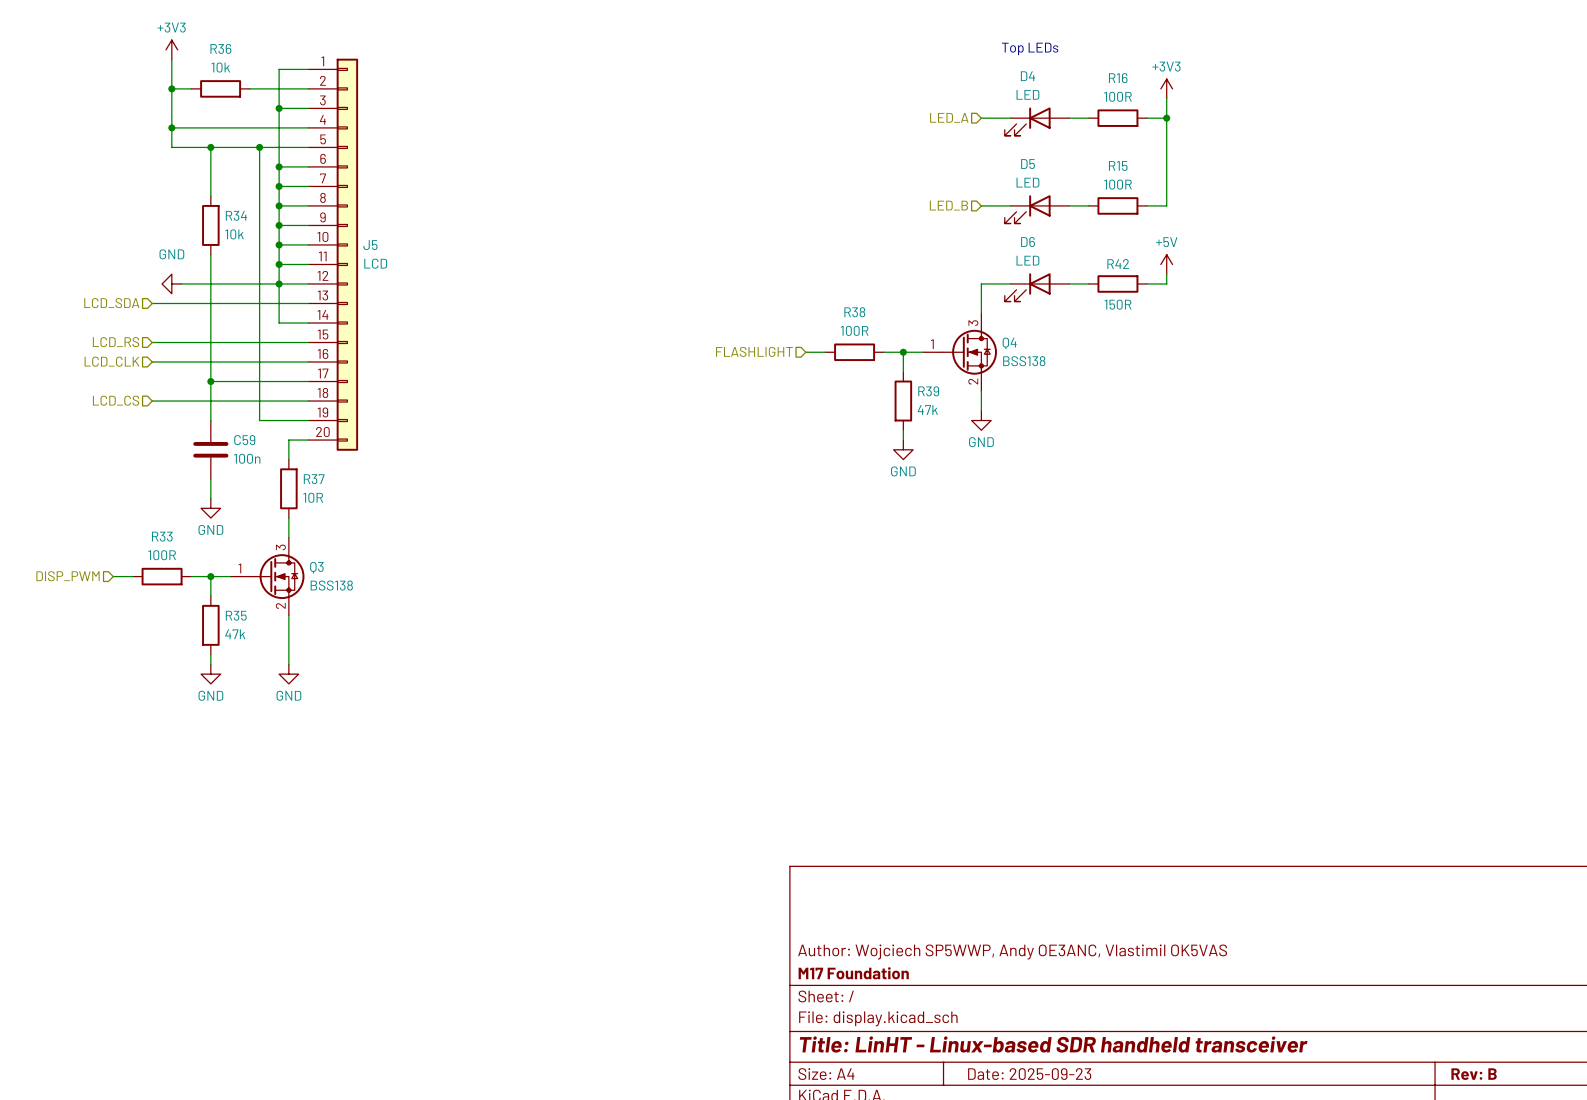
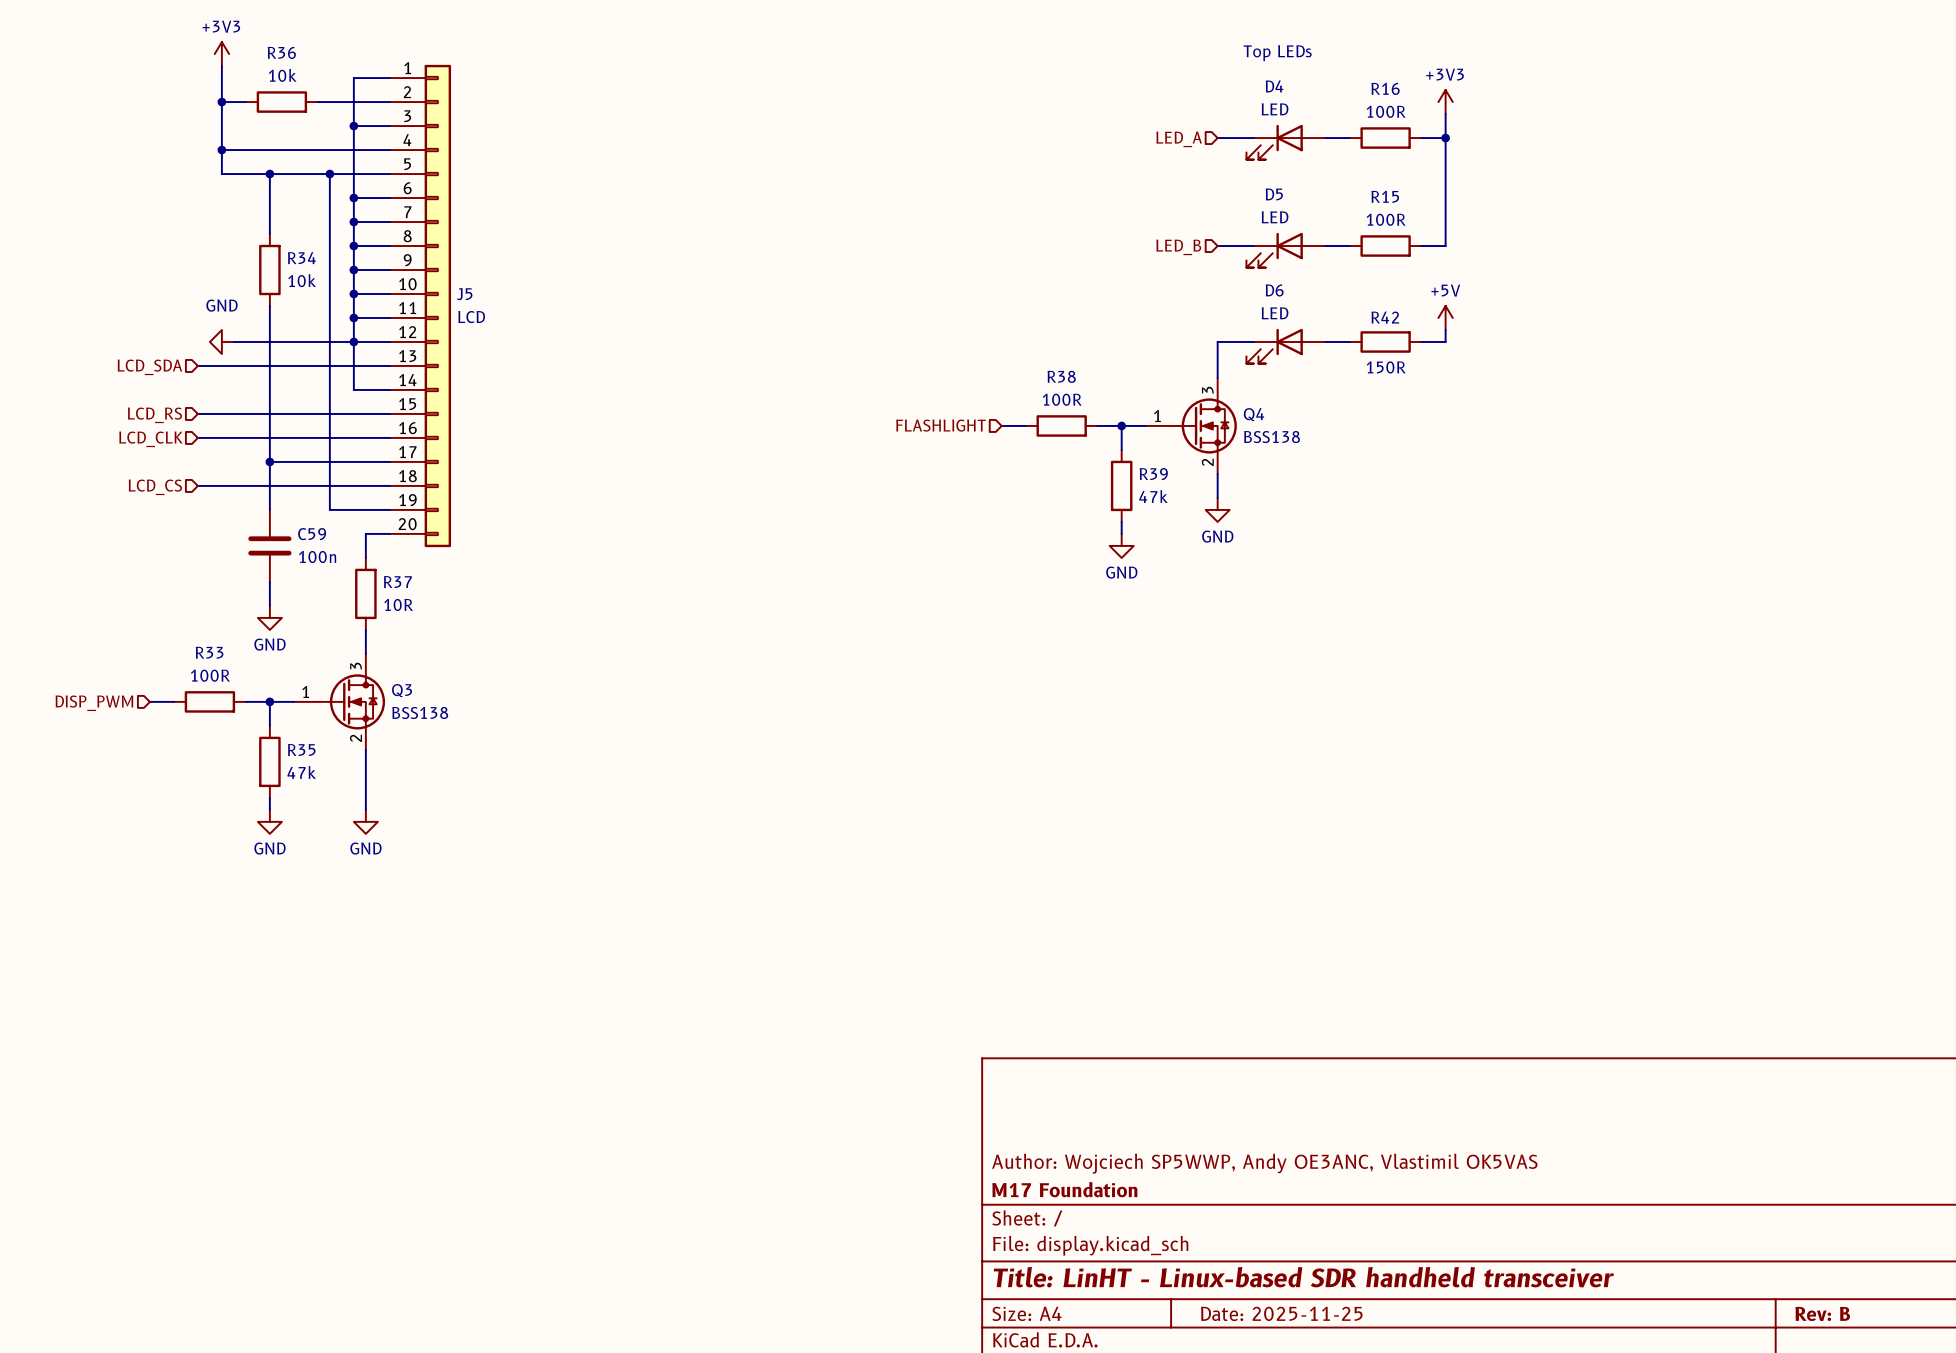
title block: Date: 2025-09-23 (1029, 1074) -> Date: 2025-11-25 (1281, 1313)

